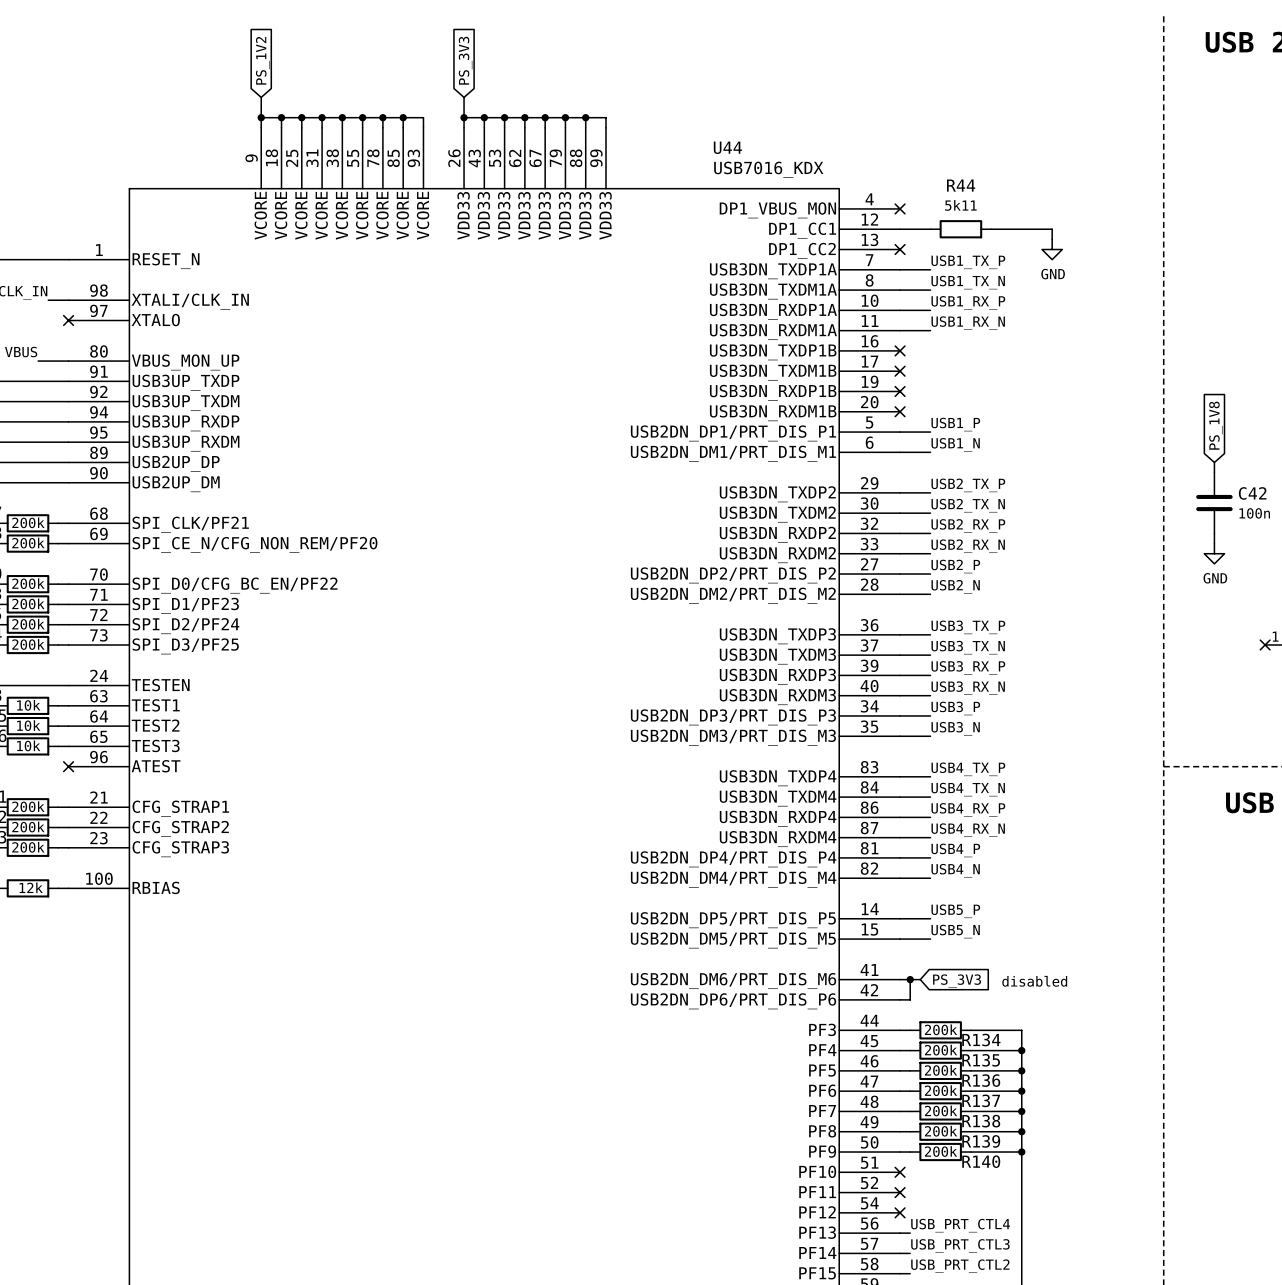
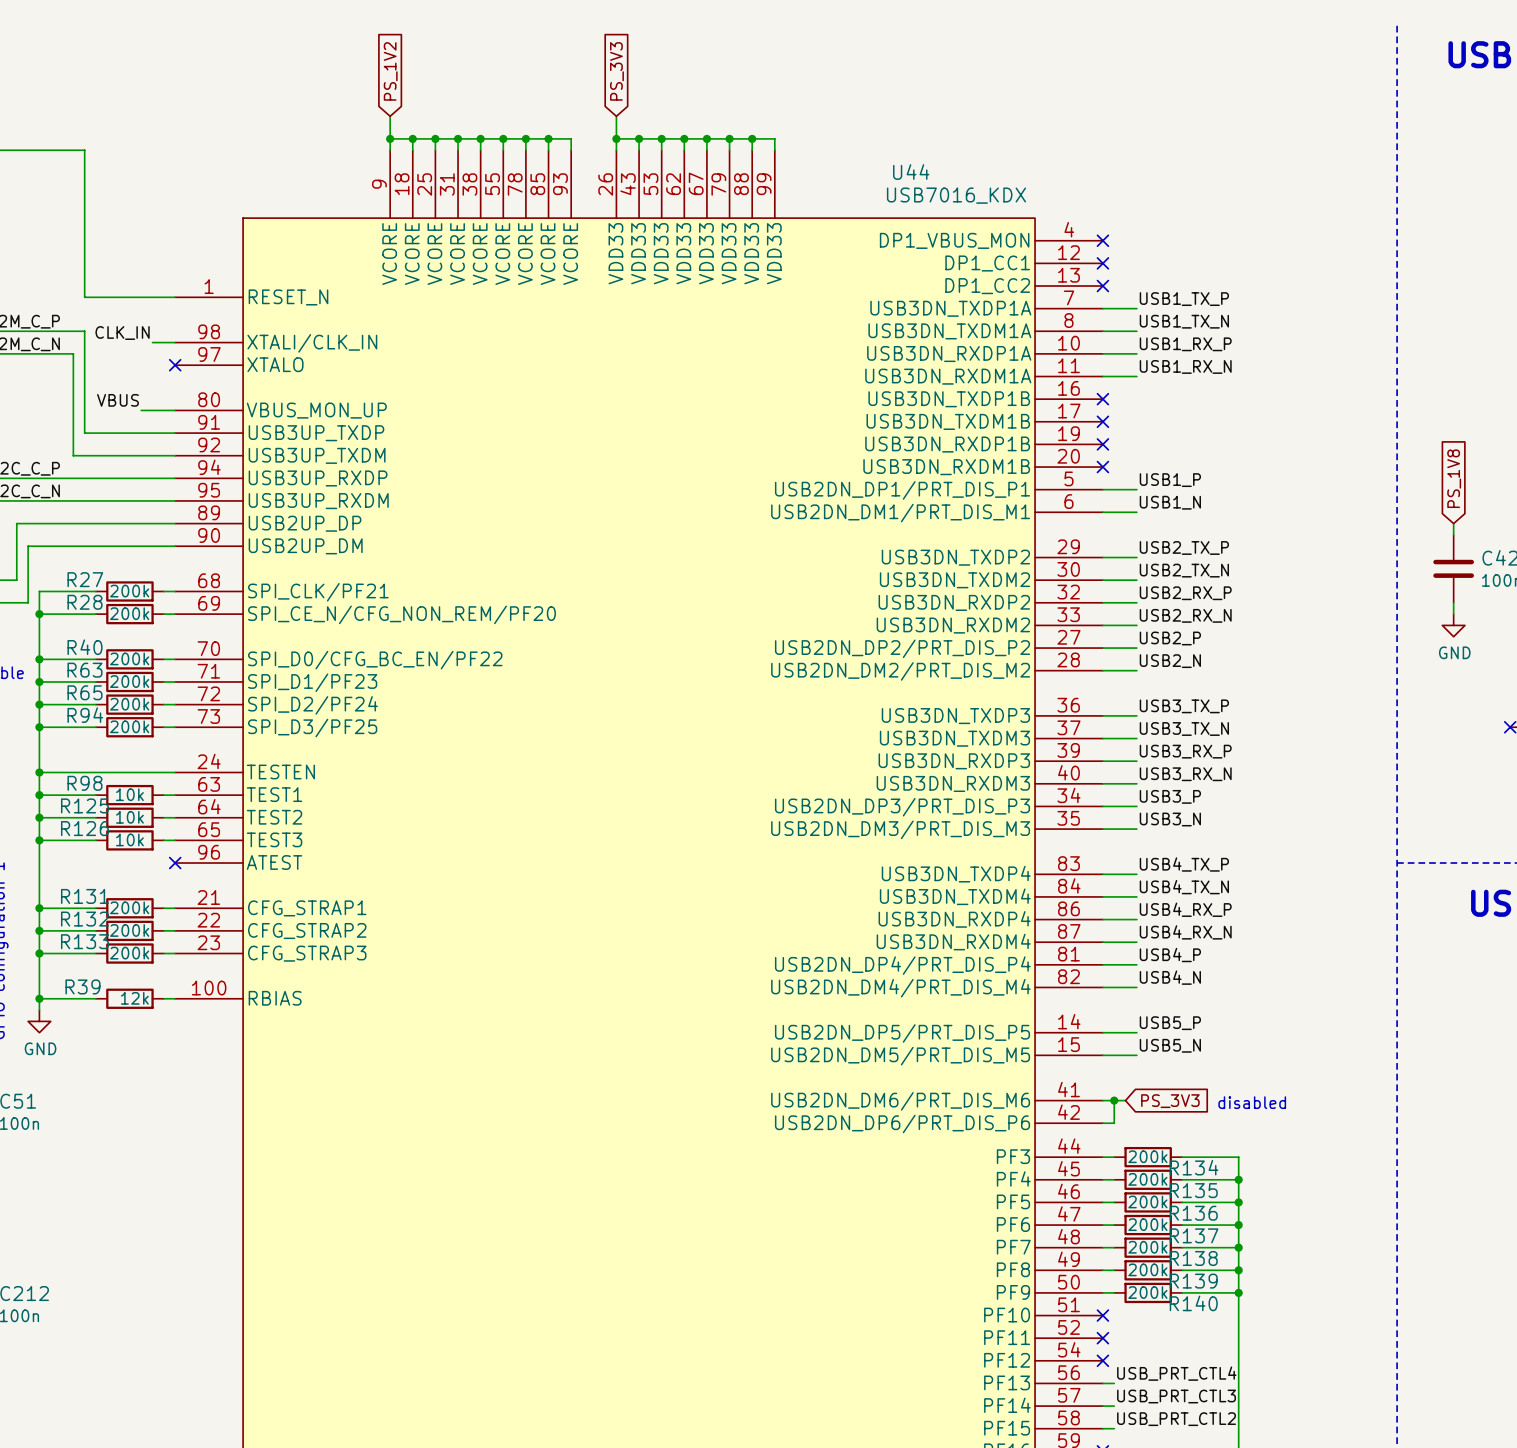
wire: (900, 229) (930, 229) -> none
no-connect mark: none -> (1102, 263)
R44: (960, 229) -> none
wire: (991, 229) (1052, 229) (1052, 239) -> none
power symbol: GND (1052, 249) -> none

